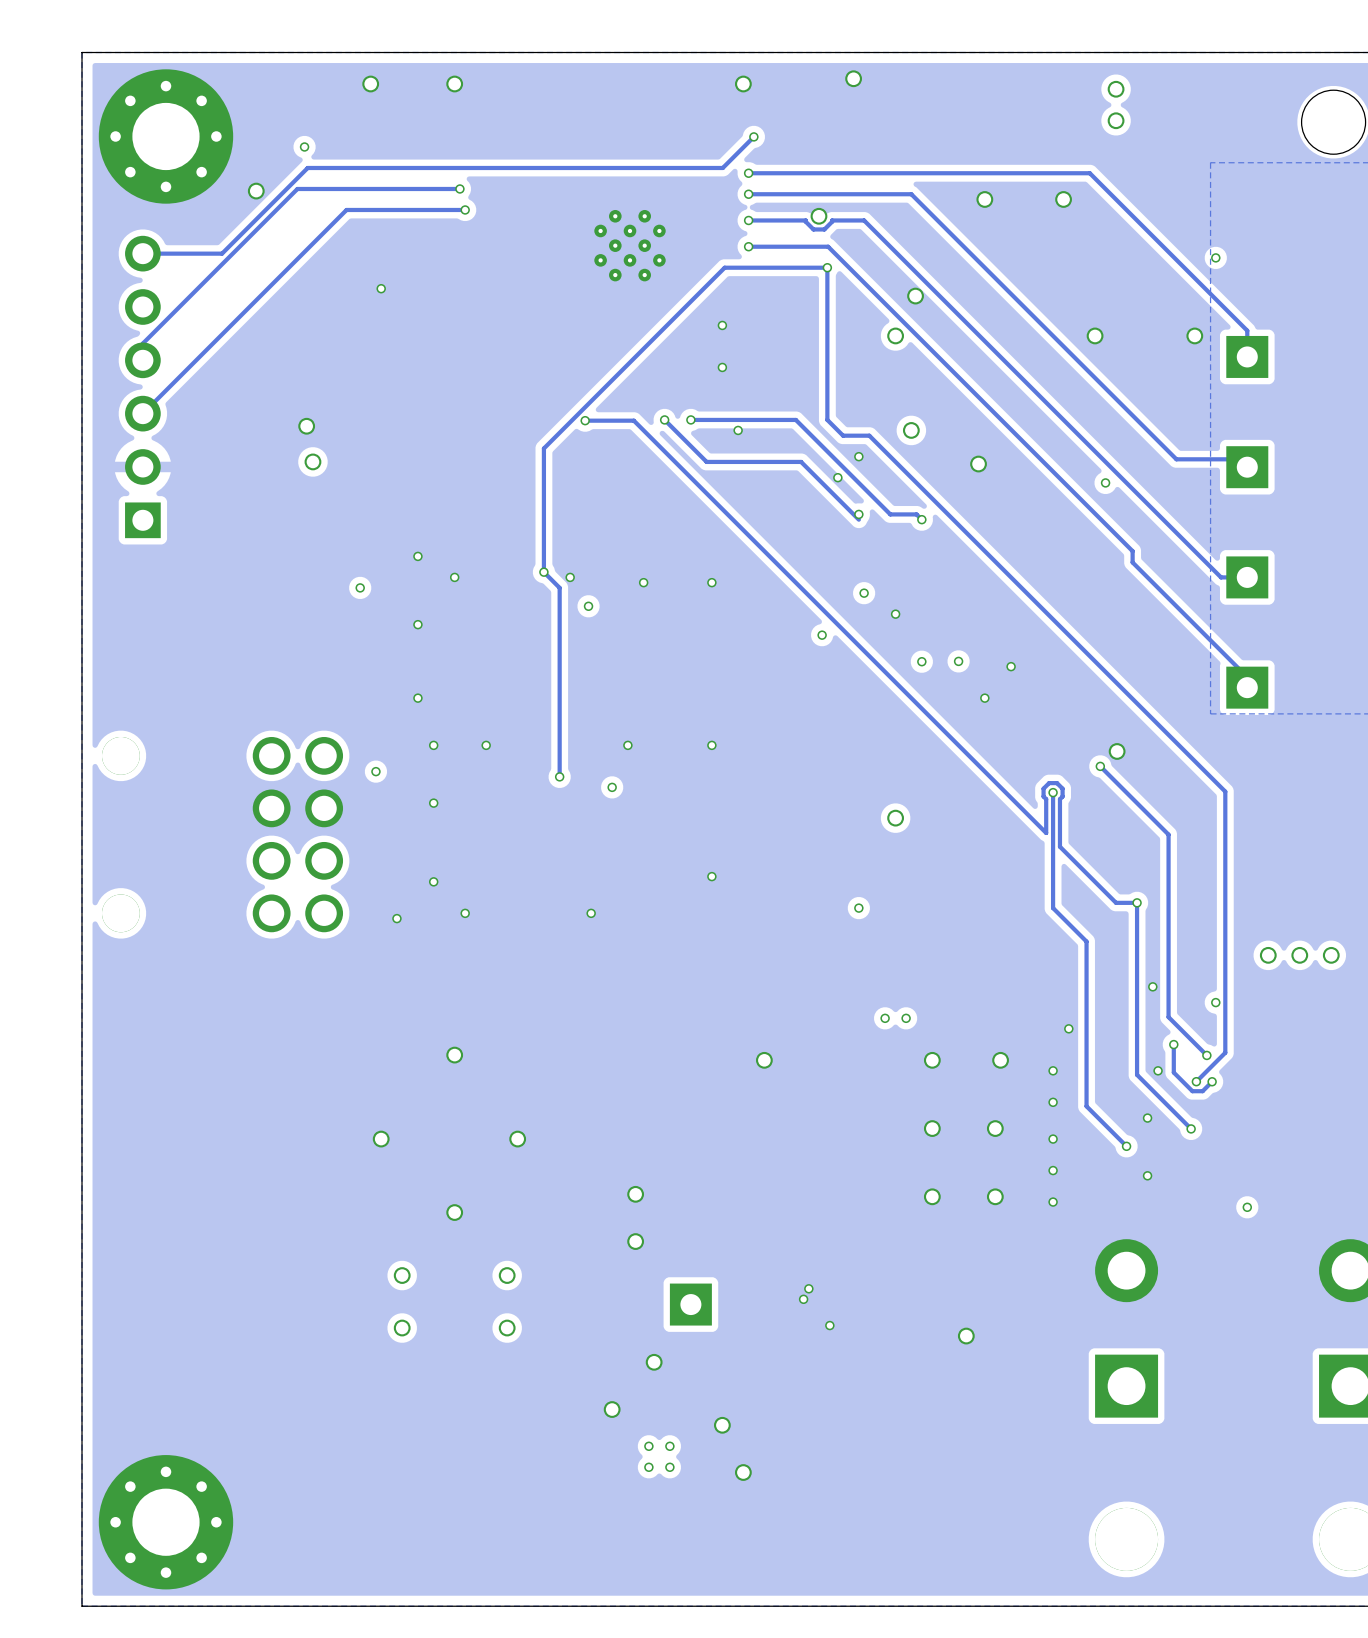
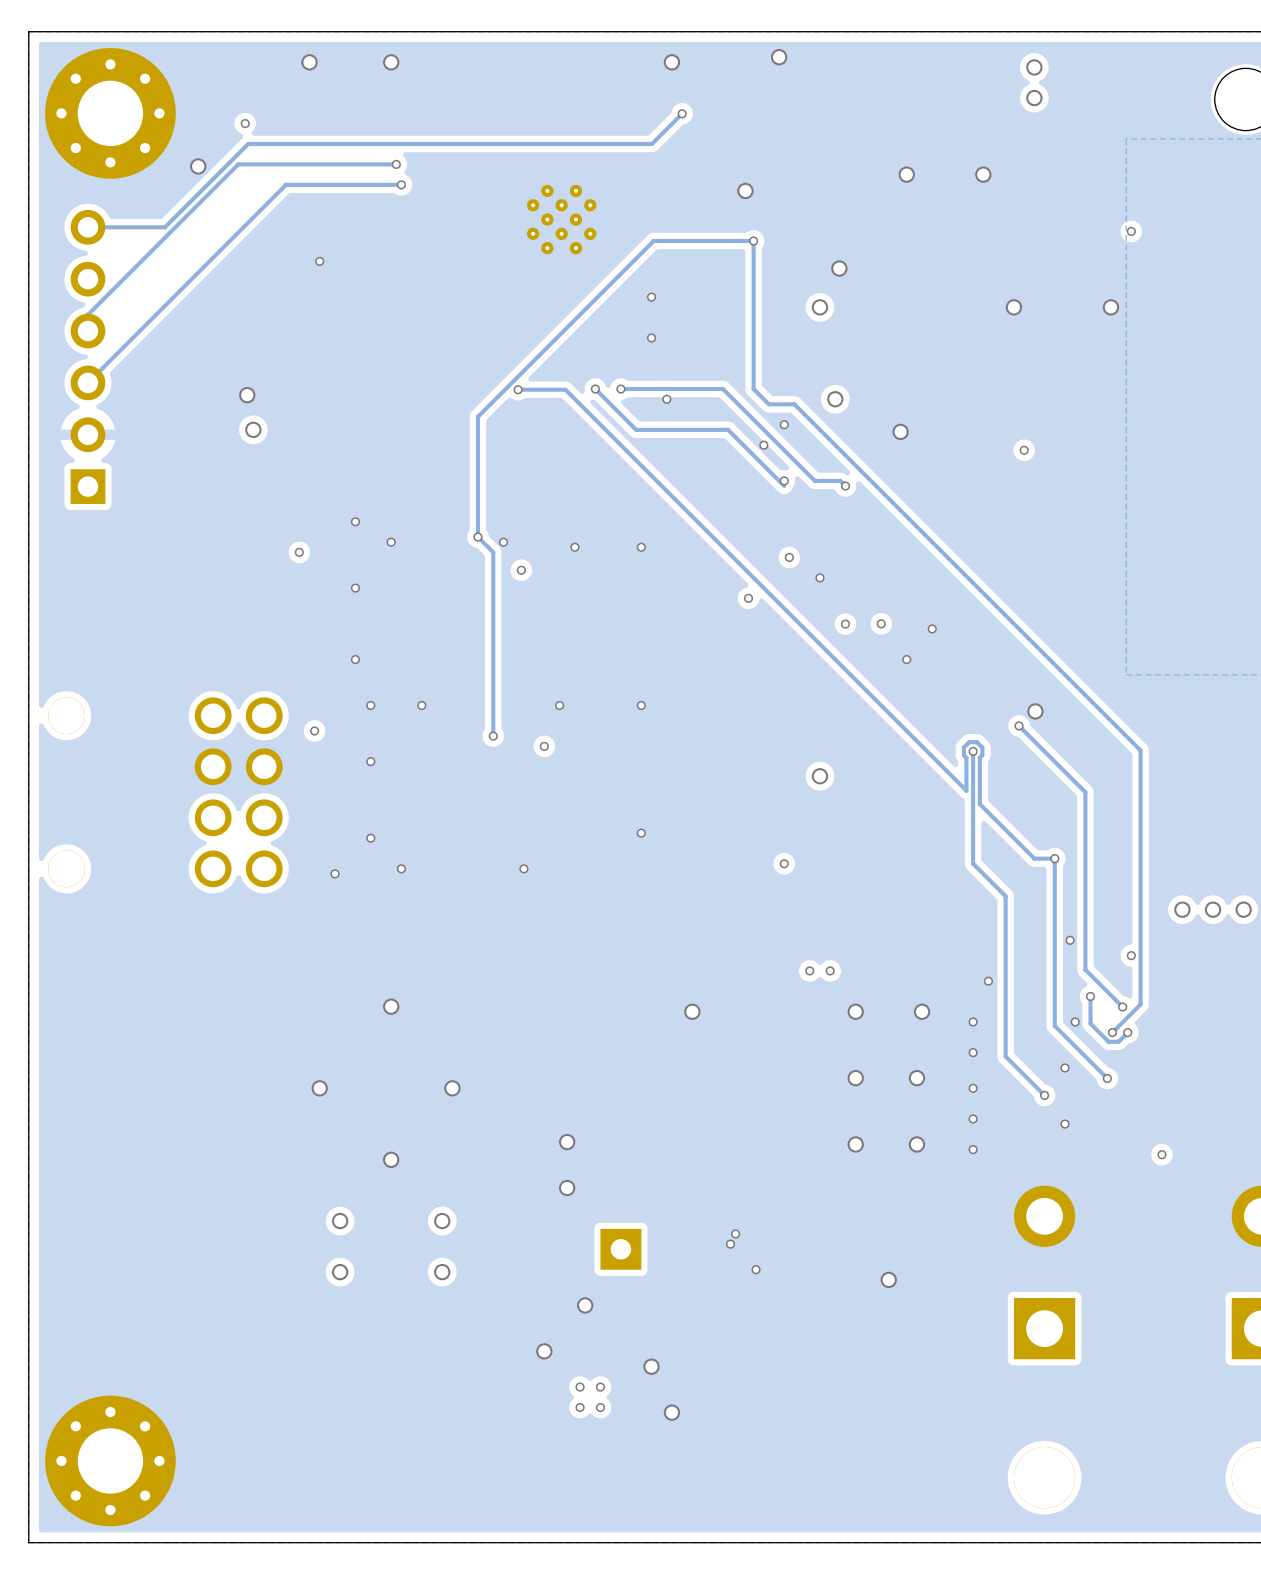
track: (748, 173) (1089, 173) (1247, 330) (1247, 356) -> none
via: (748, 173) -> none
track: (748, 194) (911, 194) (1176, 459) (1239, 459) (1247, 467) -> none
via: (748, 194) -> none
track: (748, 220) (805, 220) (813, 229) (824, 229) (832, 220) (864, 220) (1221, 577) (1247, 577) -> none
via: (748, 220) -> none
track: (748, 246) (828, 246) (1132, 551) (1132, 562) (1247, 677) (1247, 687) -> none
via: (748, 246) -> none
part: (1247, 356) -> none
part: (1247, 467) -> none
part: (1247, 577) -> none
part: (1247, 687) -> none

